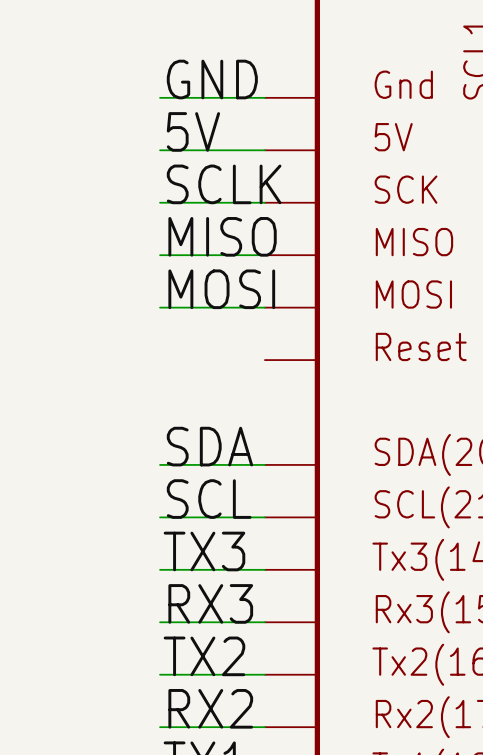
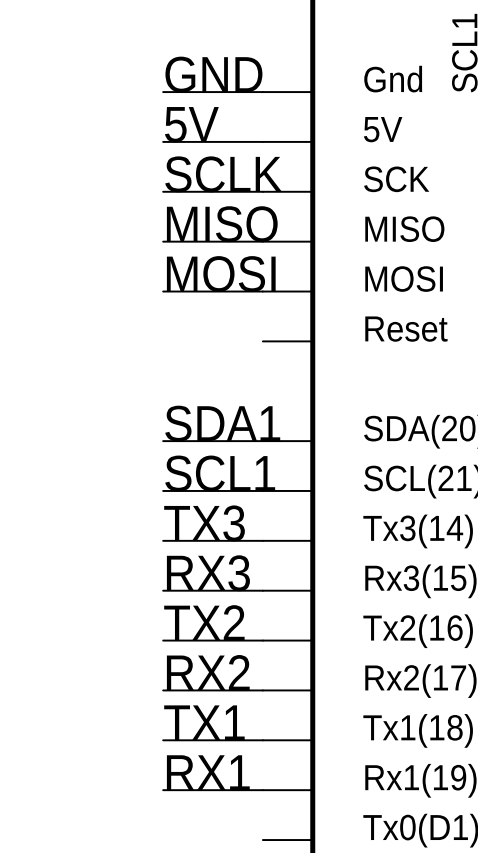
label: SDA (209, 446) -> SDA1 (222, 423)
label: SCL (209, 499) -> SCL1 (220, 473)

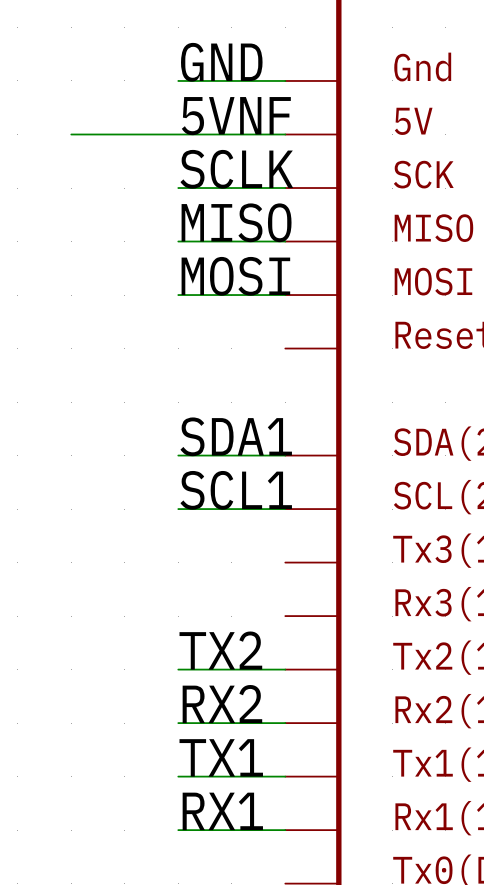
label: 5V (191, 124) -> 5VNF (236, 116)
label: TX3 (204, 523) -> none
wire: (163, 540) (262, 540) -> (71, 134) (178, 134)
label: RX3 (208, 573) -> none
wire: (163, 590) (262, 590) -> none

